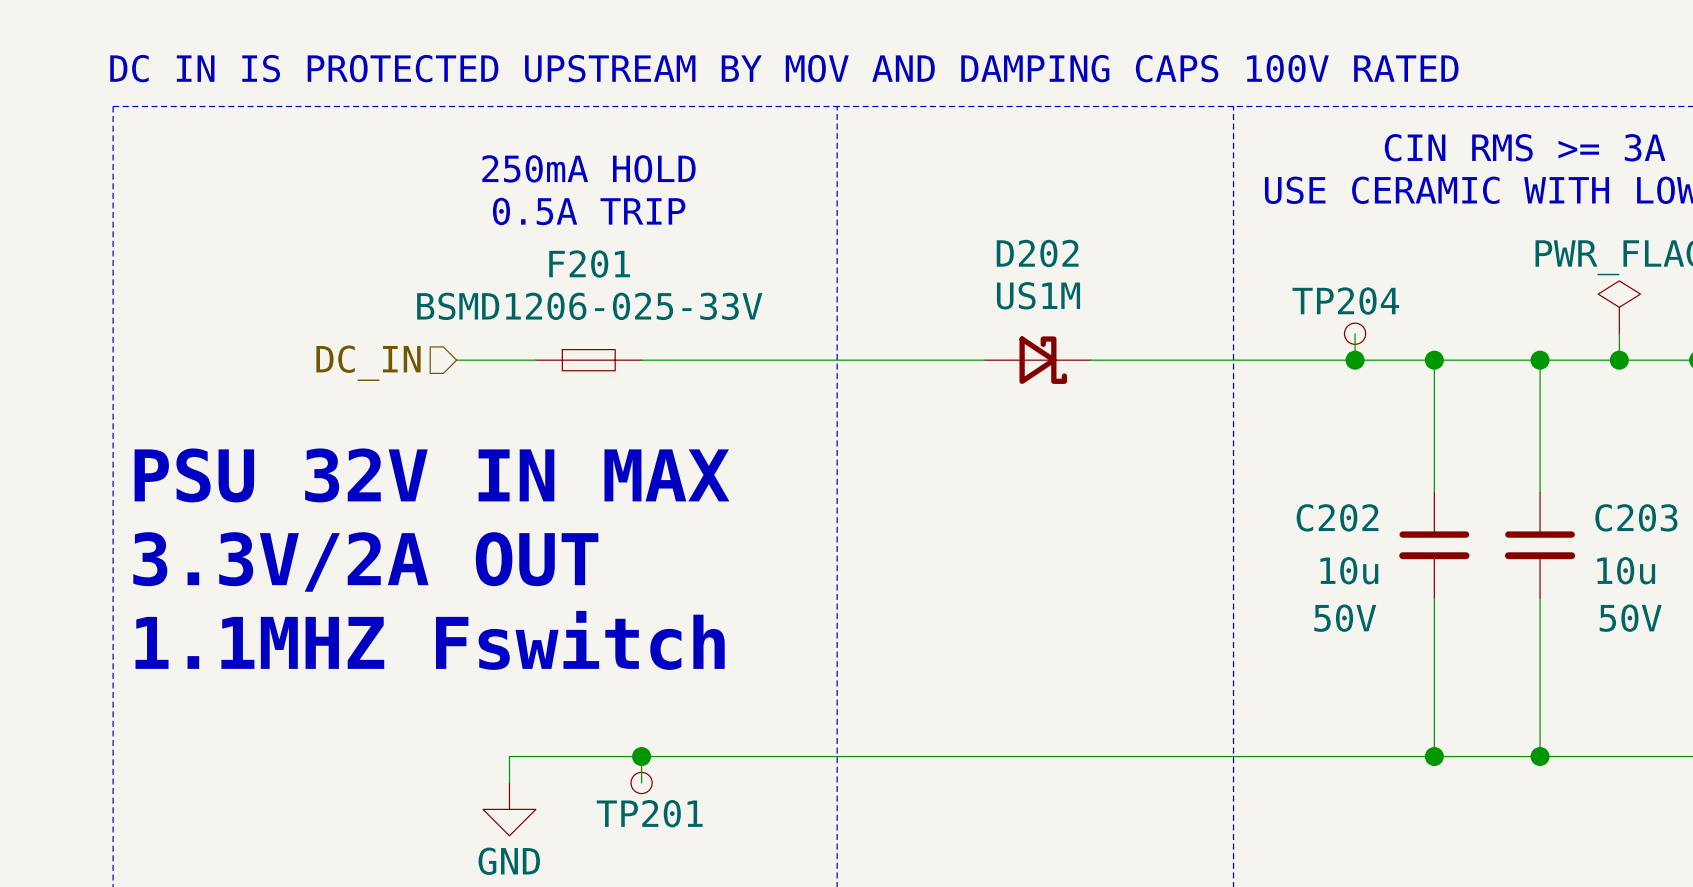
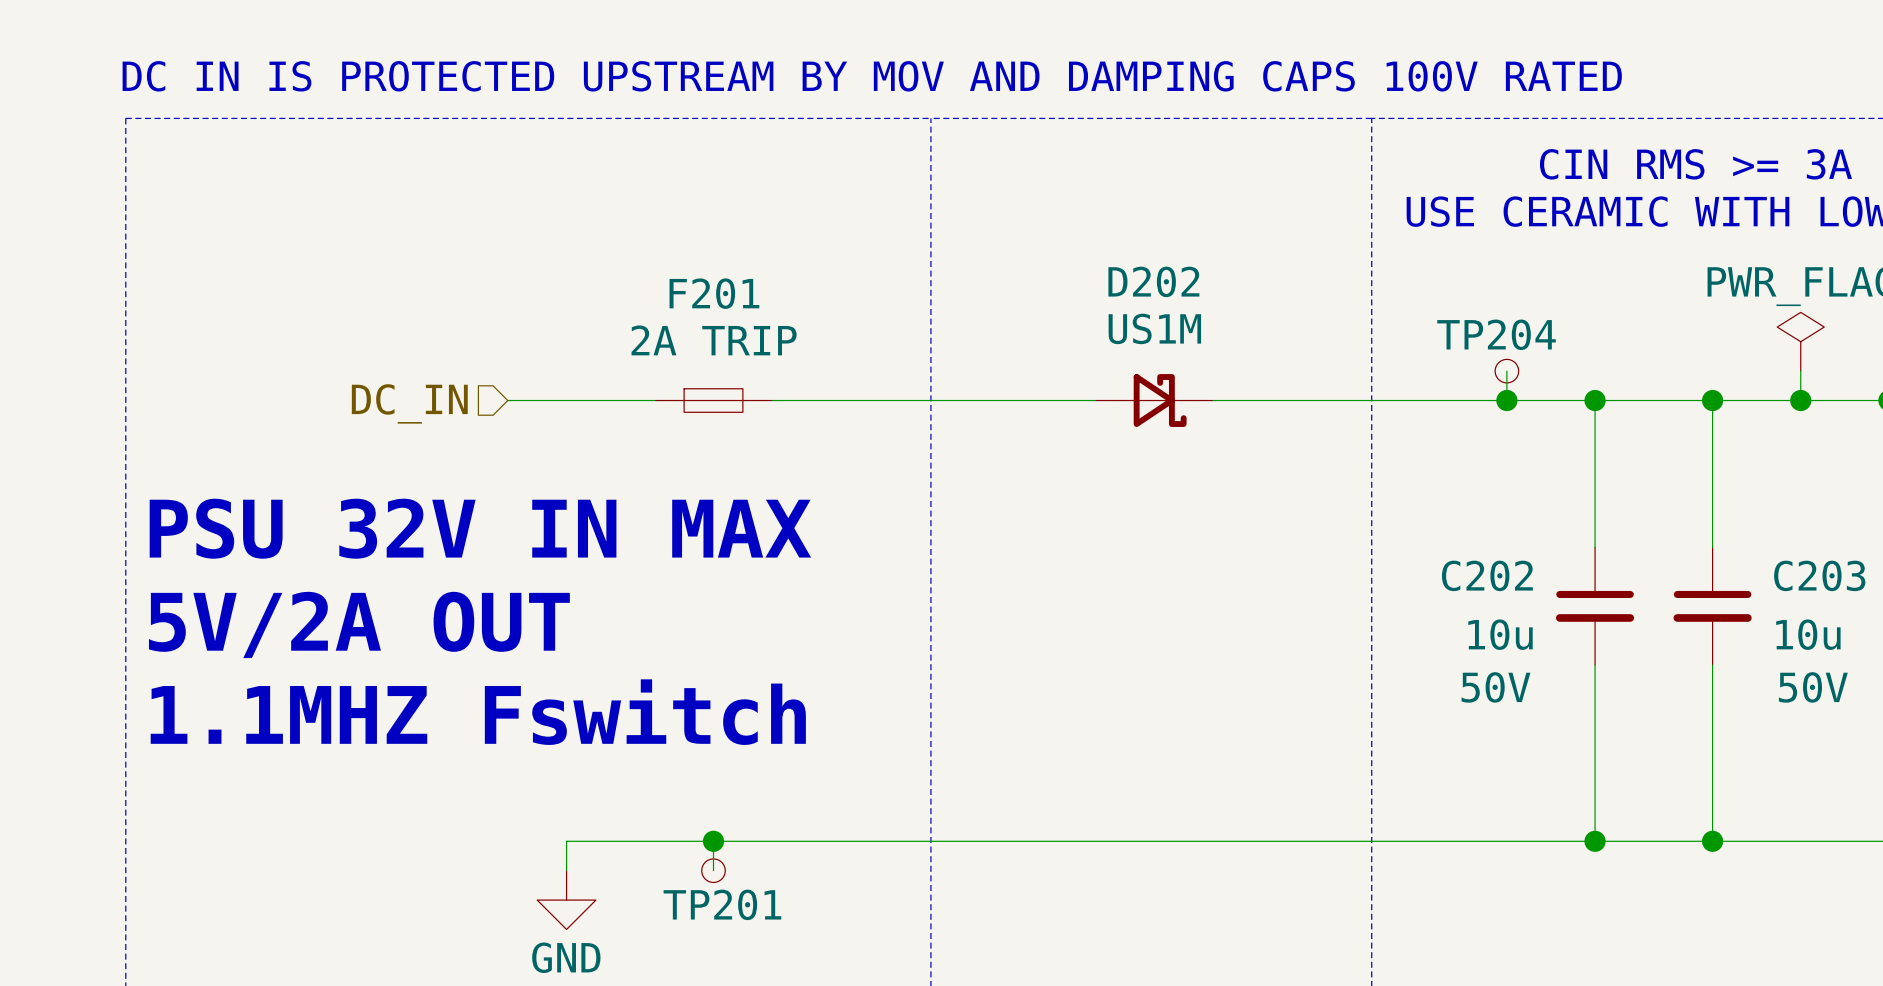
text: 250mA HOLD (588, 168) -> none
text: 0.5A TRIP (589, 211) -> none
F201 value: BSMD1206-025-33V (589, 306) -> 2A TRIP (714, 340)
F201 position: (588, 360) -> (713, 400)
text: 3.3V/2A OUT (365, 561) -> 5V/2A OUT (359, 624)

